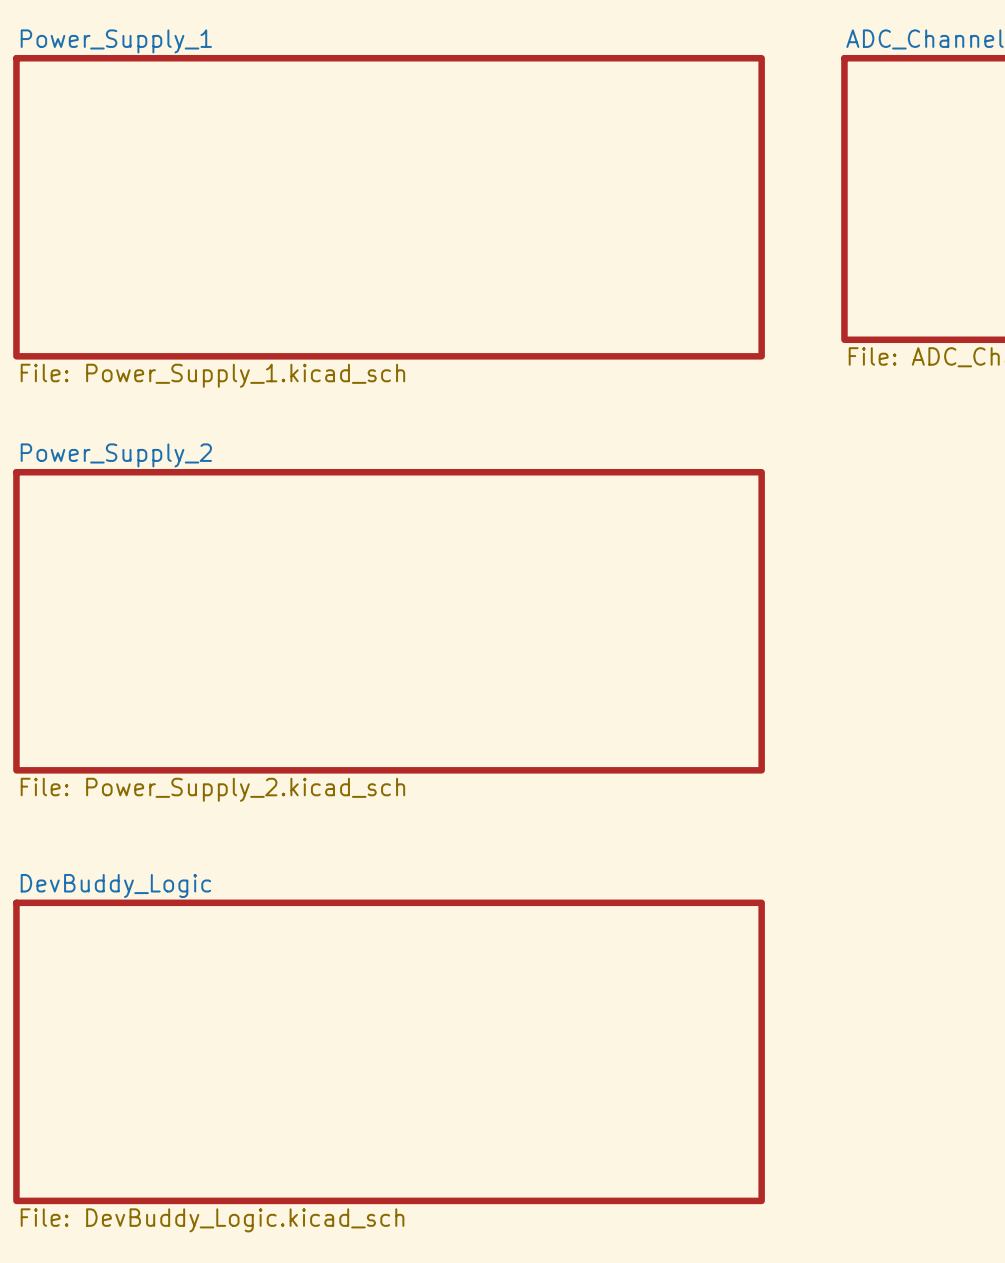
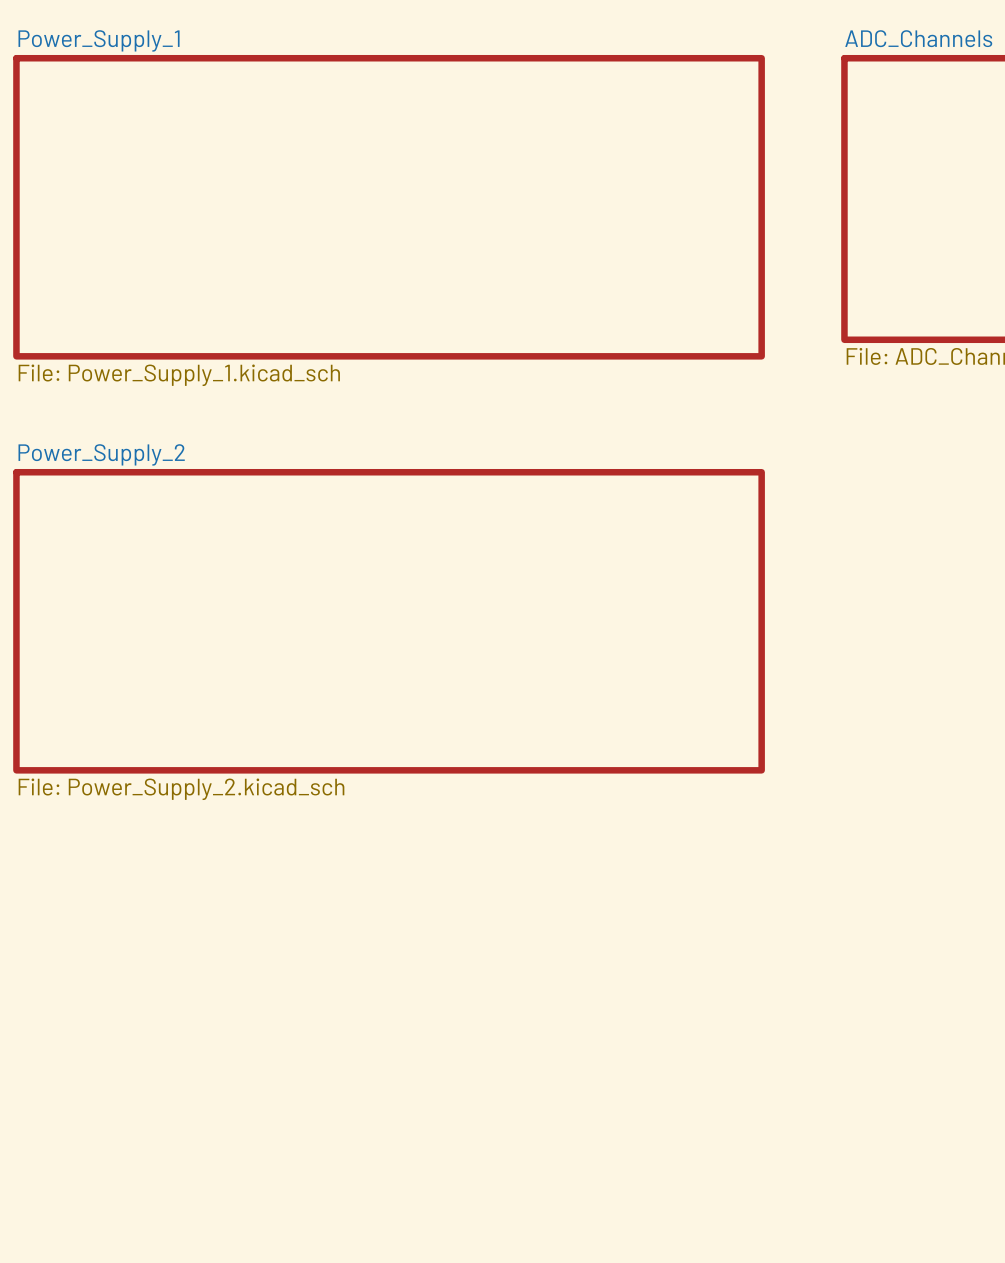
sheet DevBuddy_Logic: File: DevBuddy_Logic.kicad_sch (389, 1051) -> none

